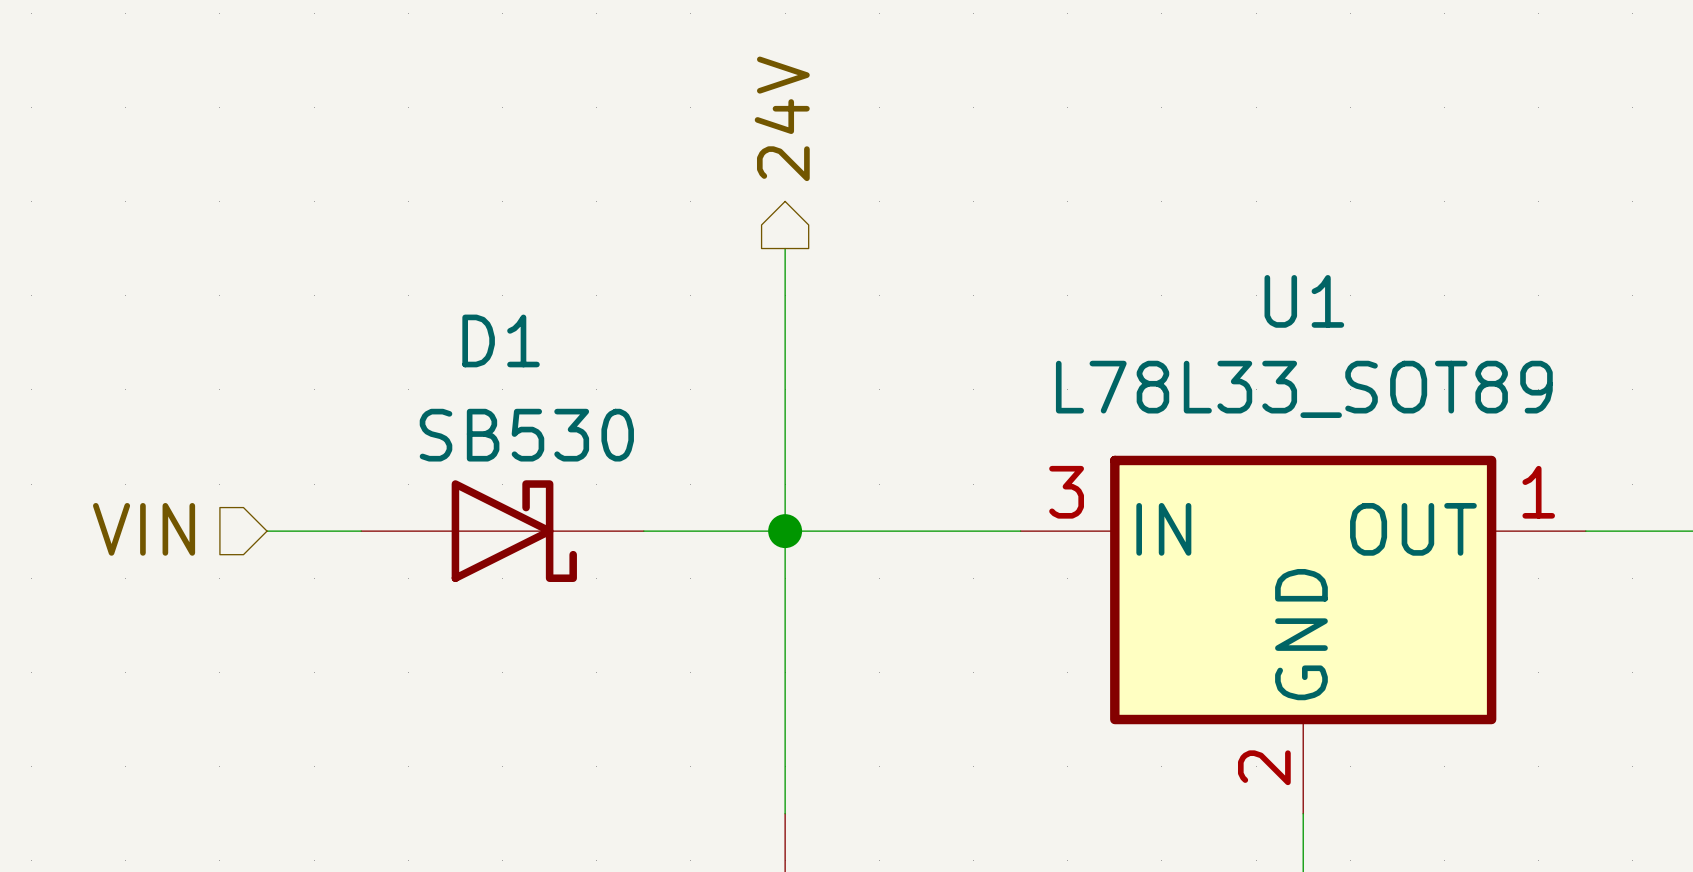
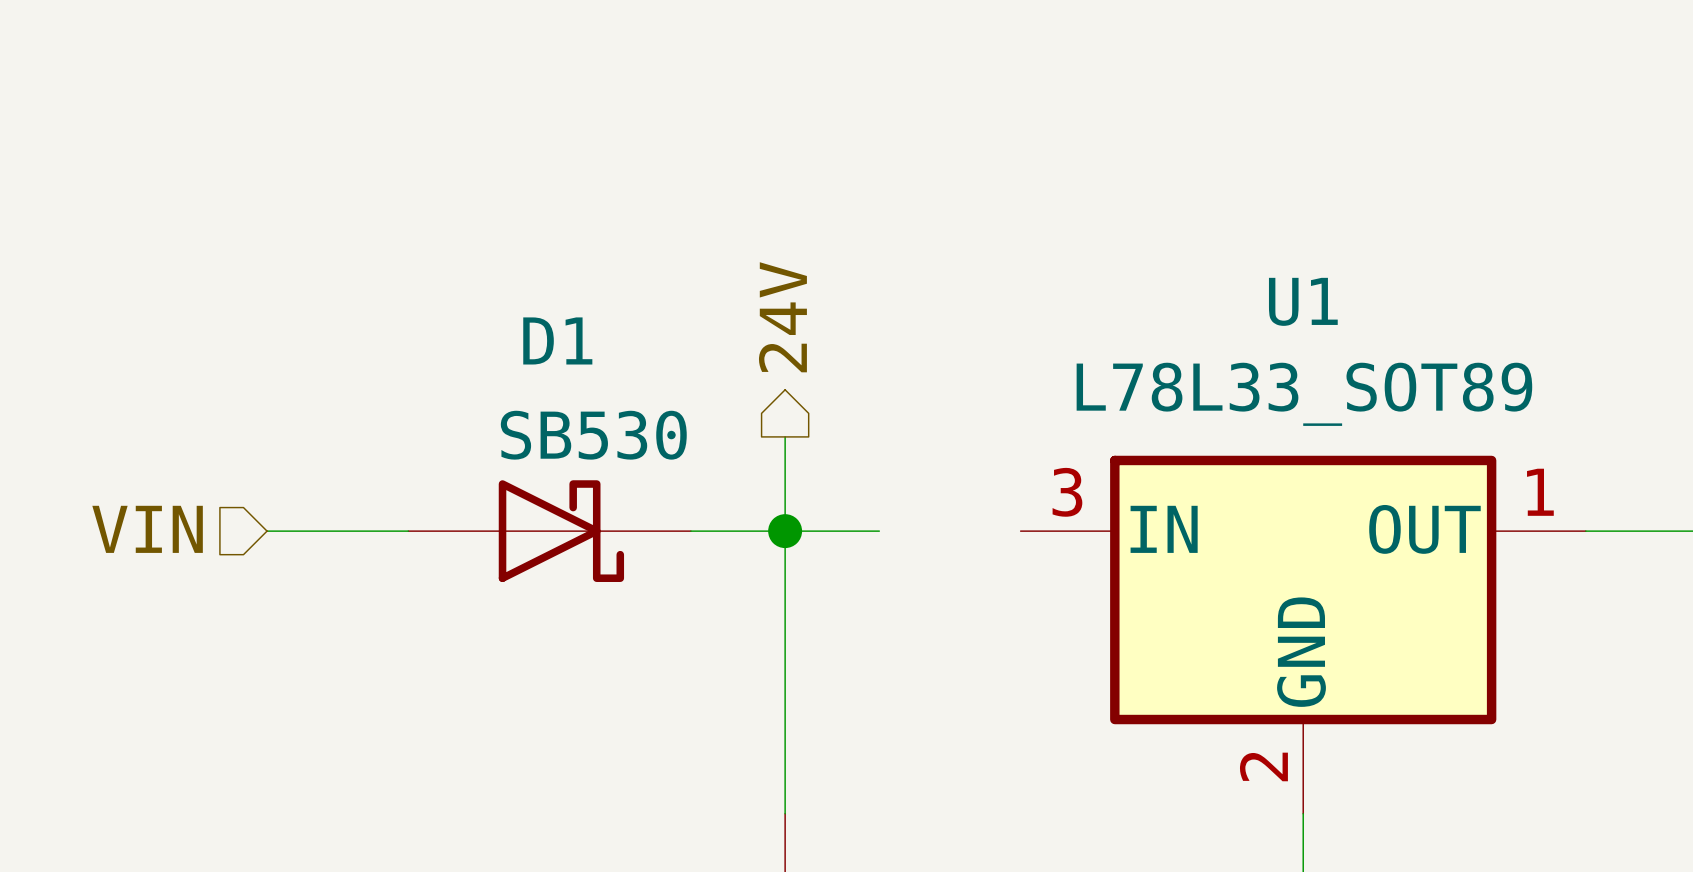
hierarchical label position: 24V (782, 118) -> 24V (782, 317)
wire: (785, 248) (785, 436) -> none
D1 position: (502, 531) -> (549, 531)
wire: (879, 531) (1020, 531) -> none

